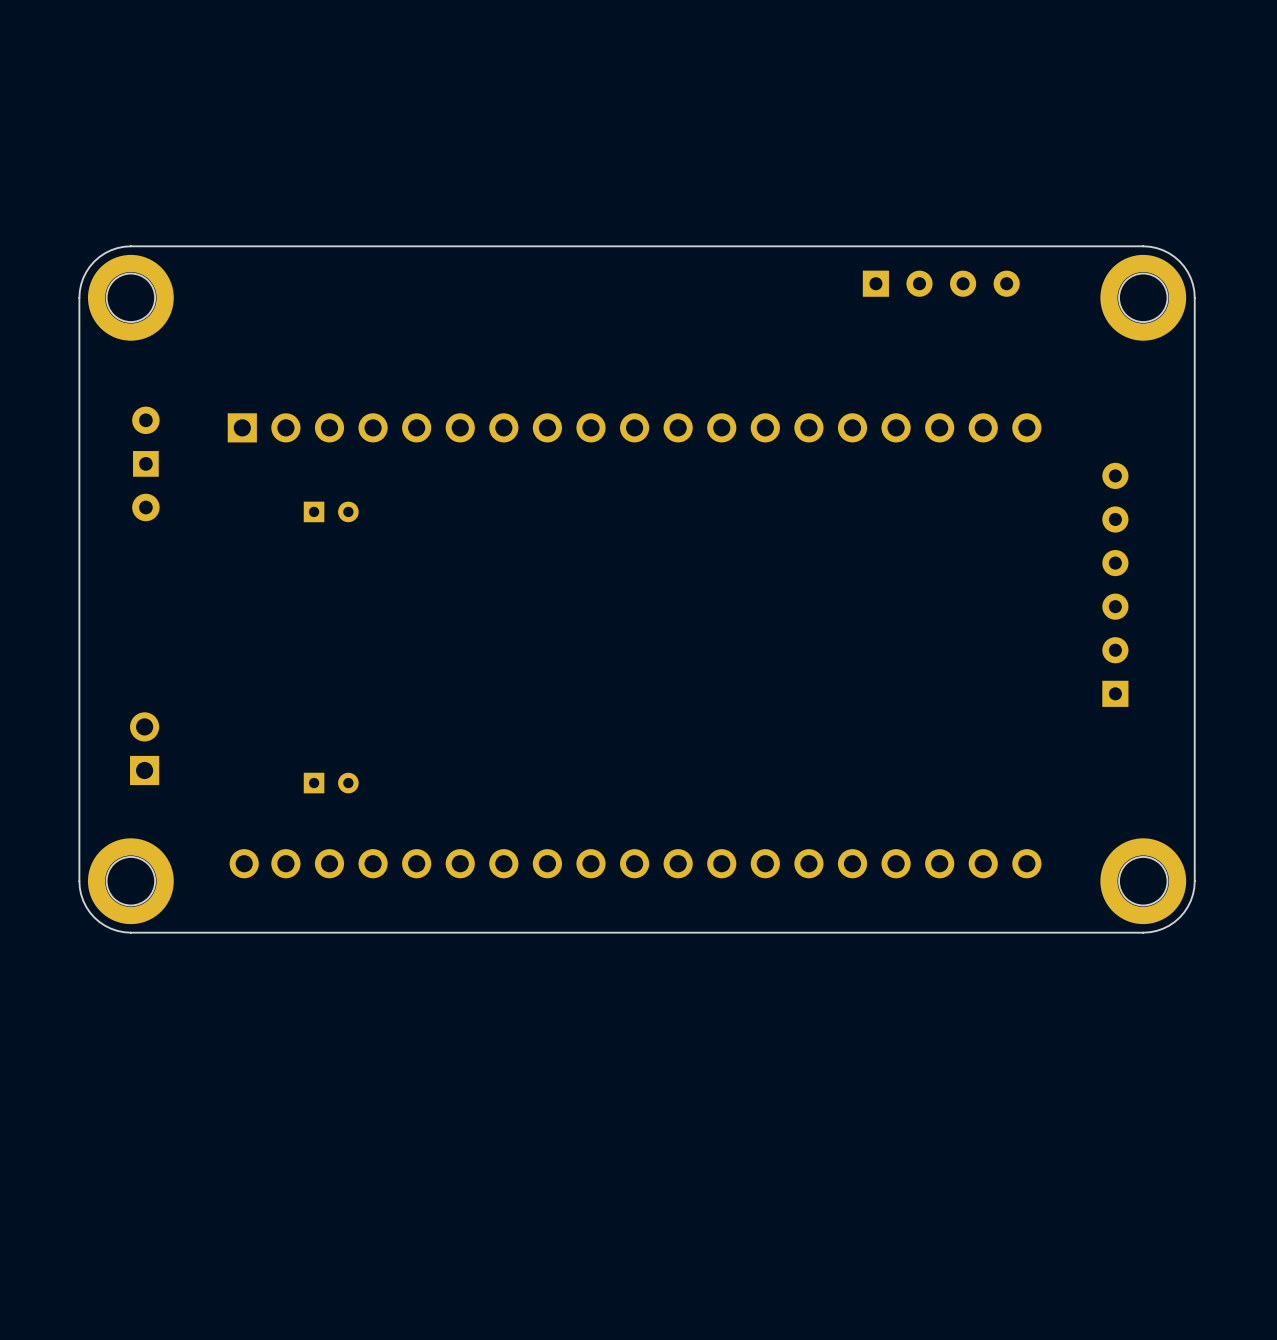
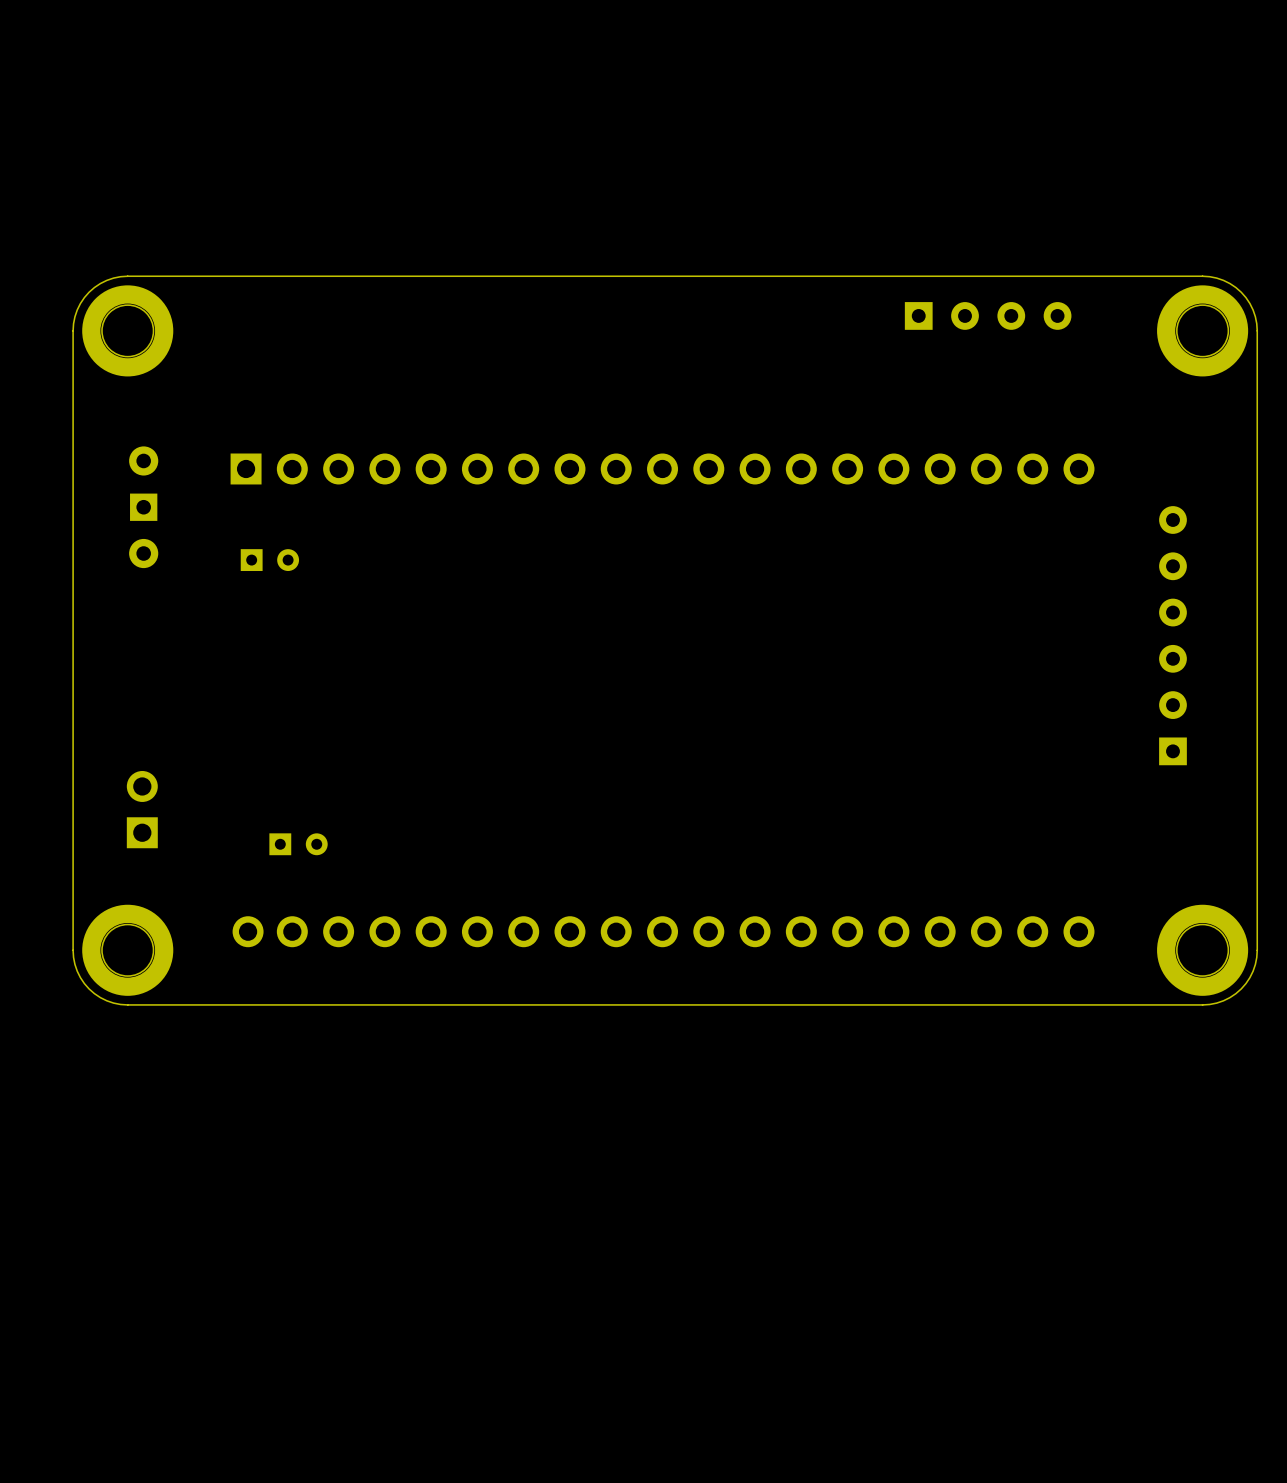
part position: (331, 511) -> (269, 560)
part position: (331, 783) -> (298, 844)

